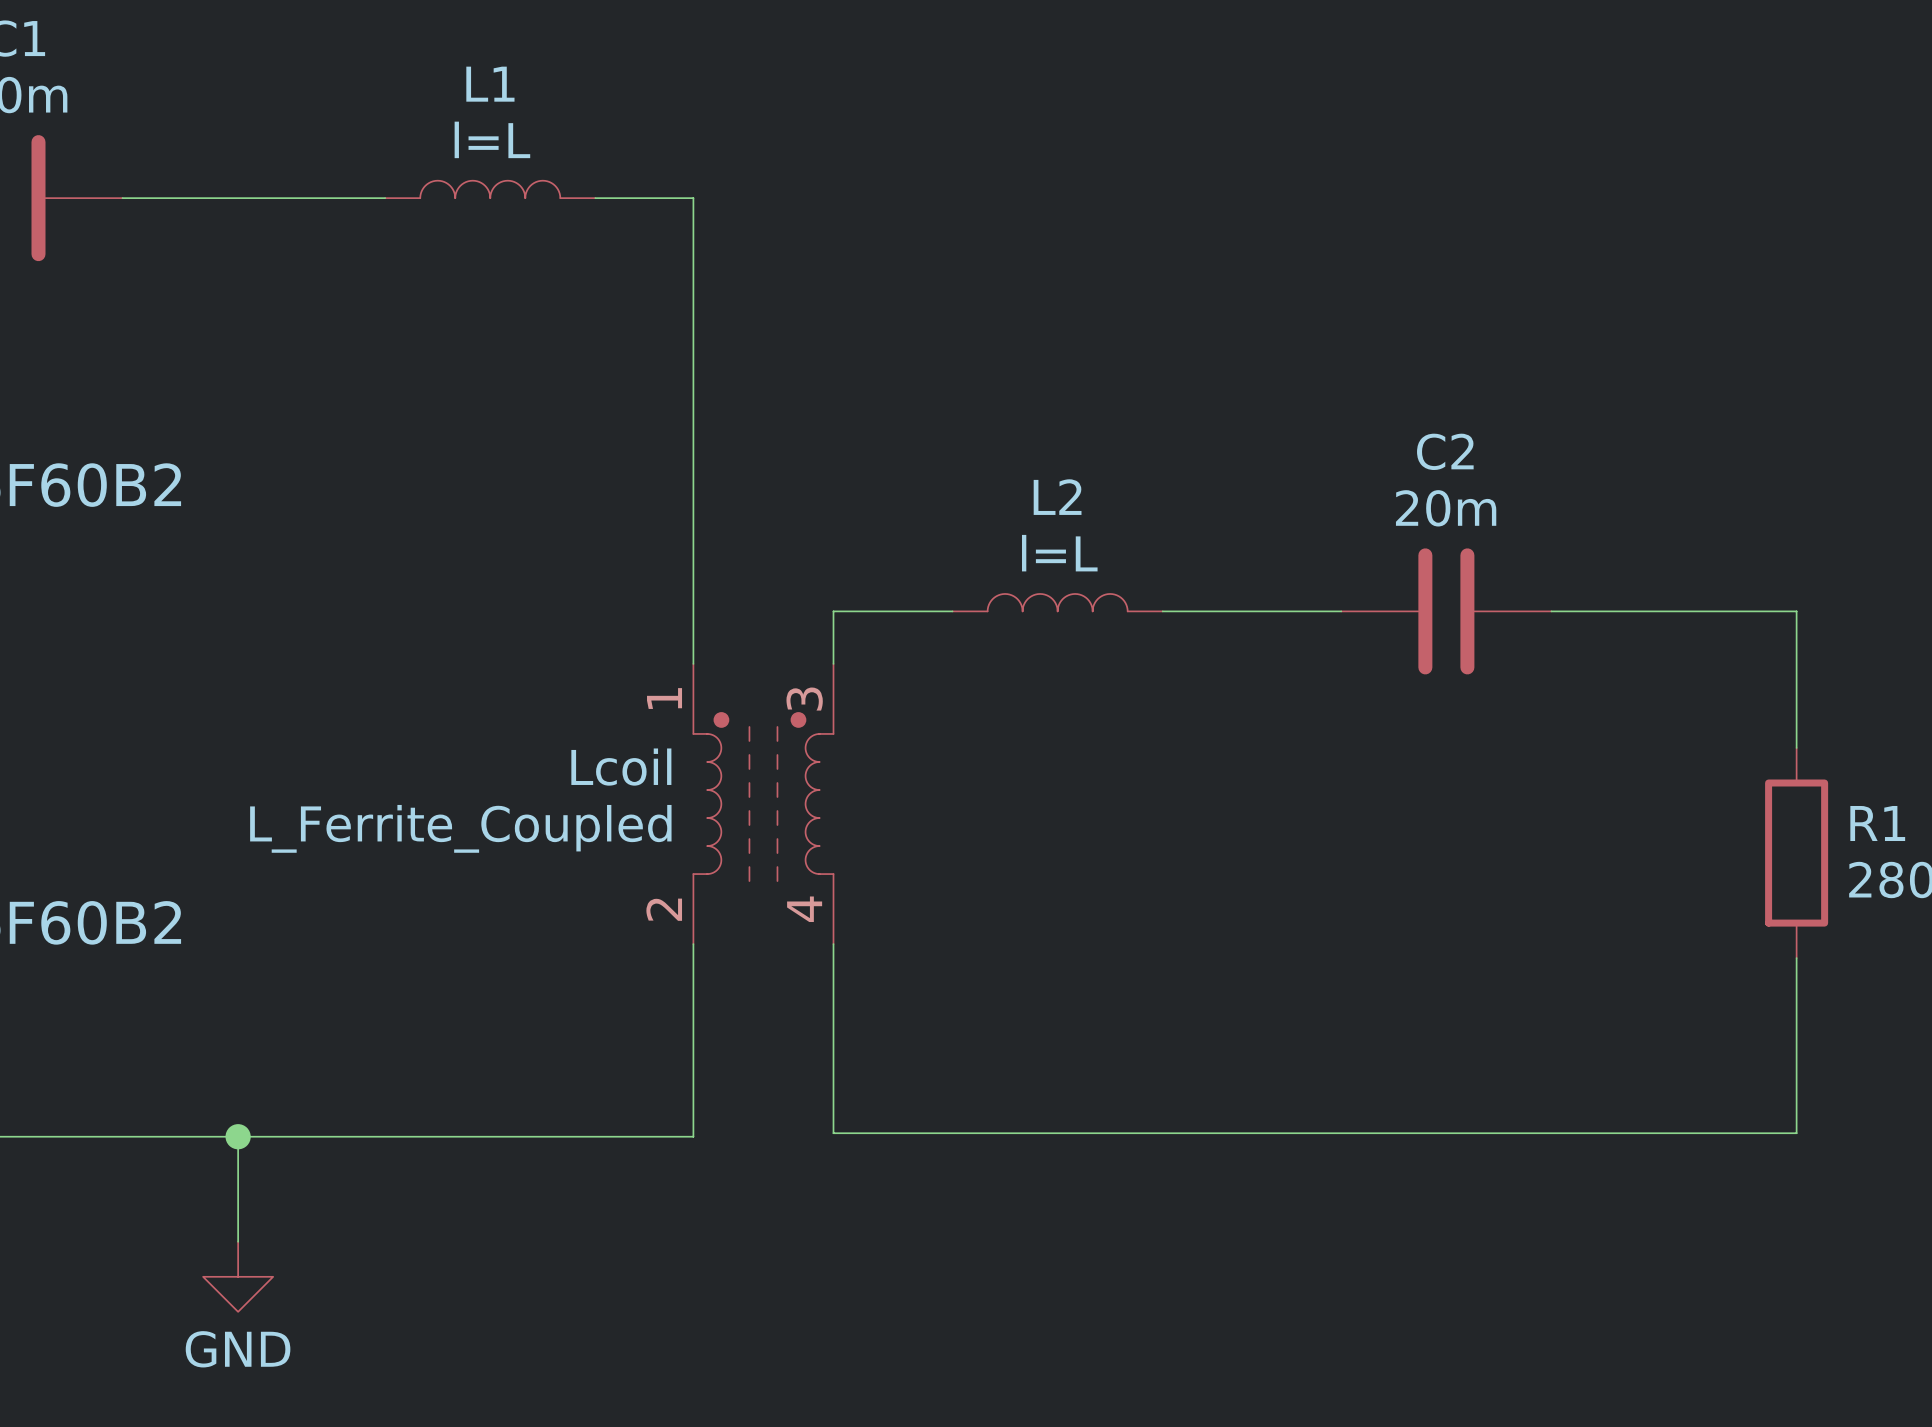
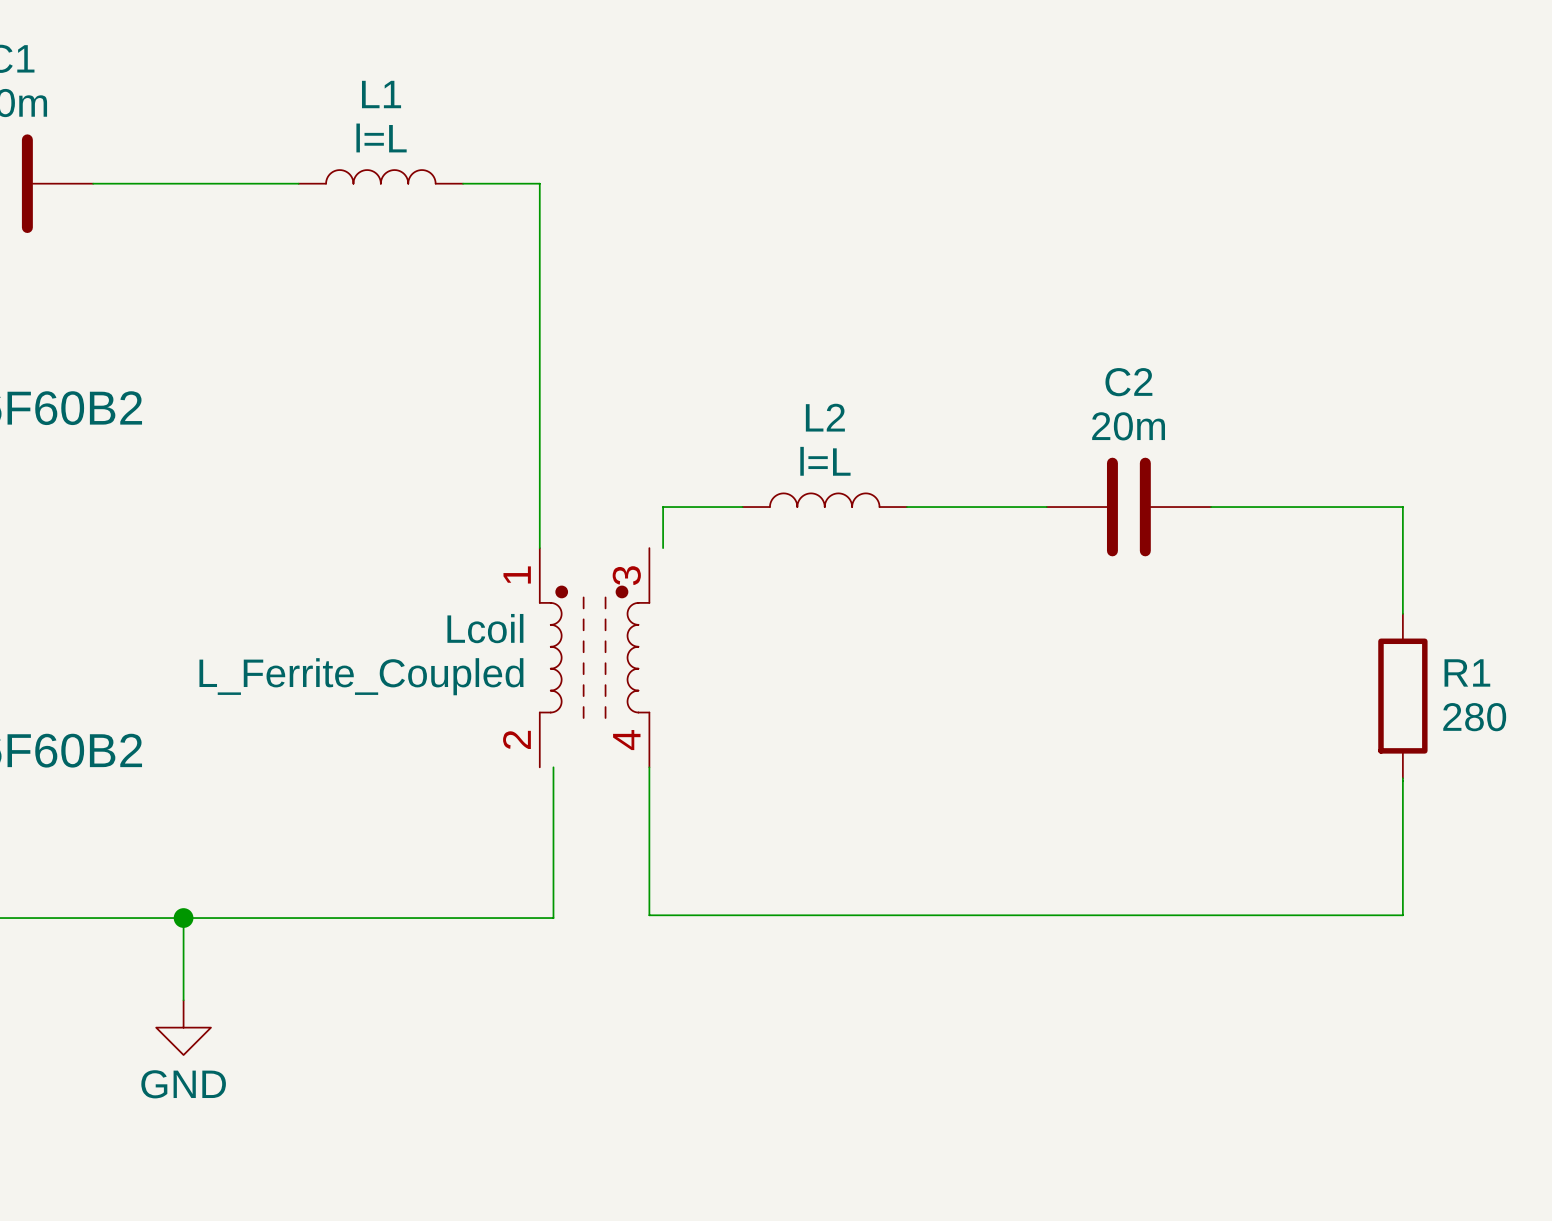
wire: (851, 611) (833, 611) (833, 663) -> (663, 507) (663, 548)
wire: (693, 944) (693, 1136) -> (553, 767) (553, 918) (539, 918)

